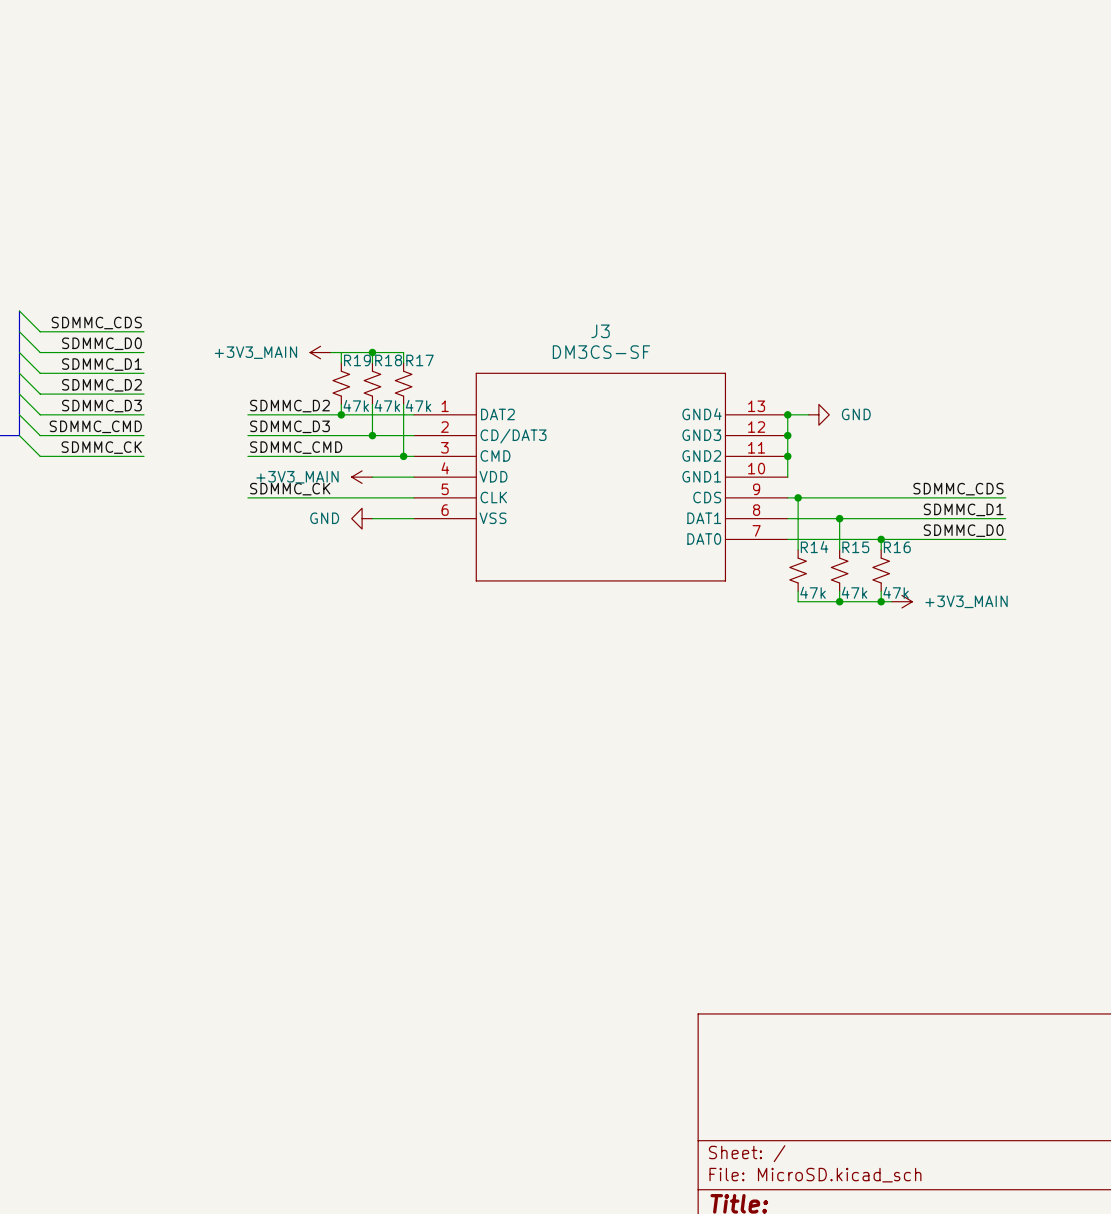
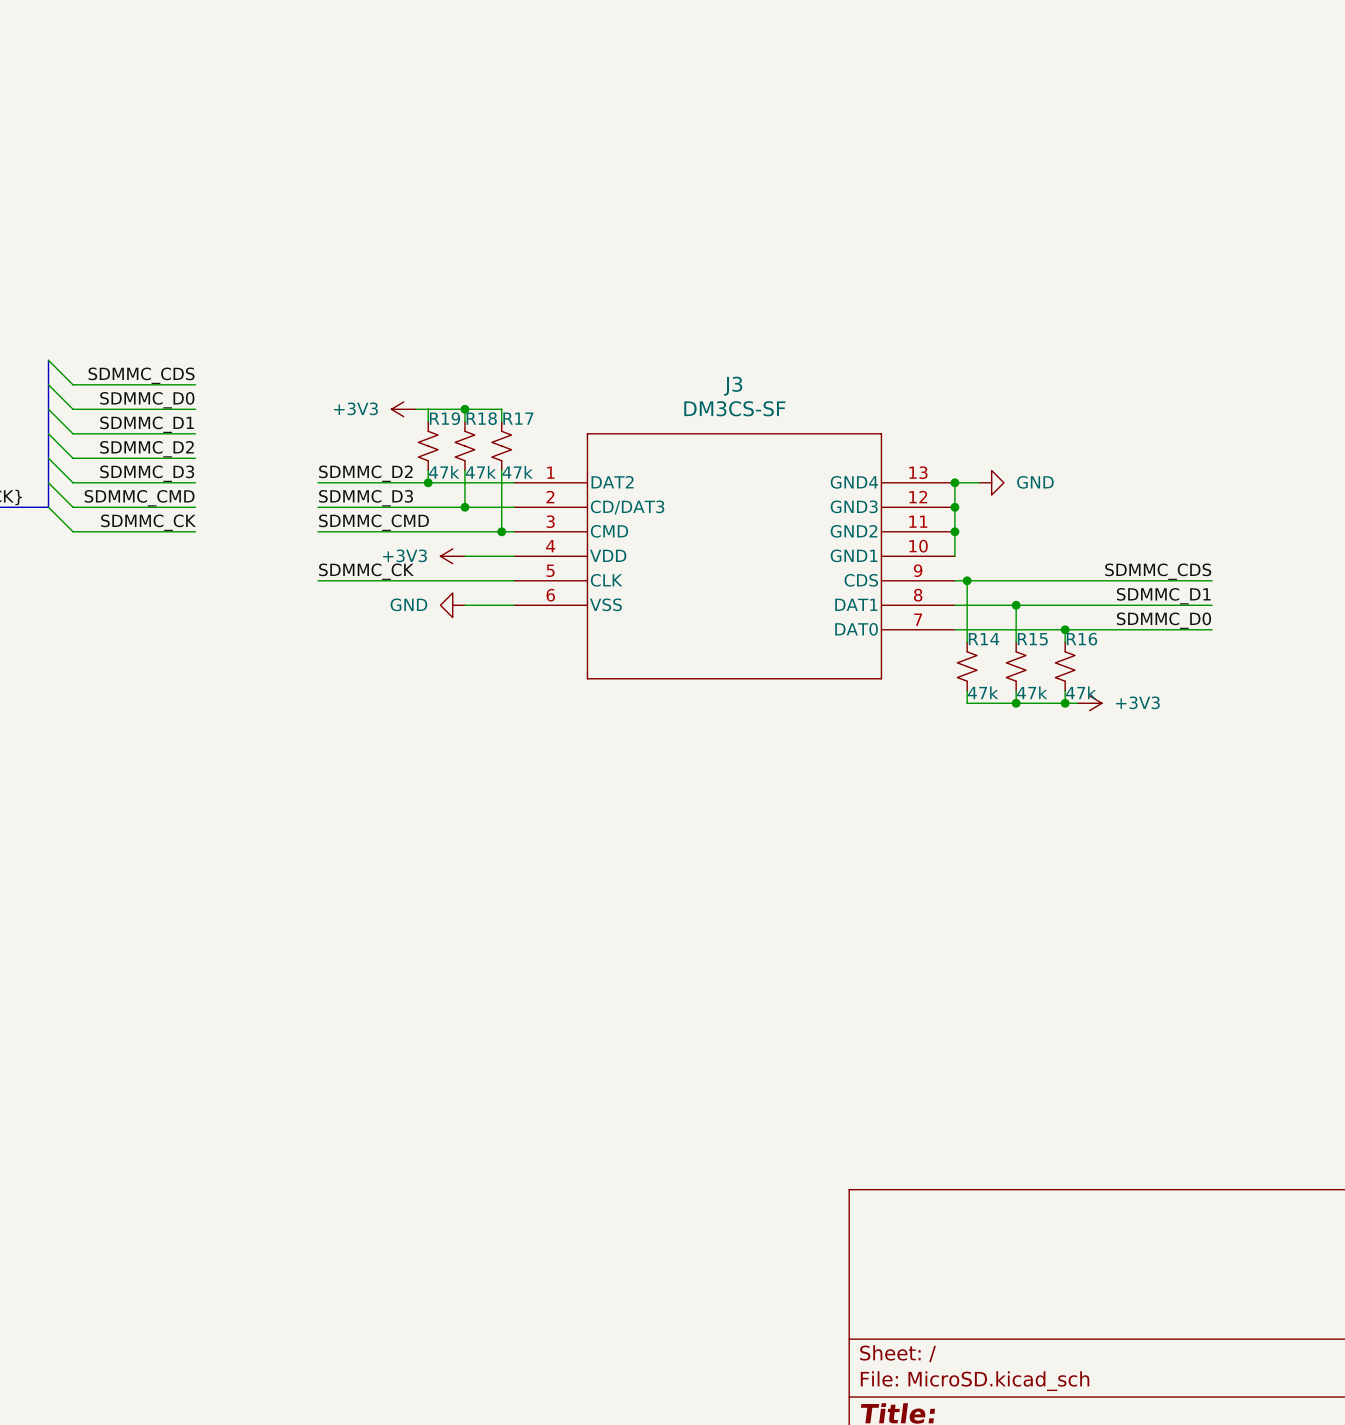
power symbol: +3V3_MAIN (320, 352) -> +3V3 (403, 409)
power symbol: +3V3_MAIN (362, 477) -> +3V3 (452, 556)
power symbol: +3V3_MAIN (901, 601) -> +3V3 (1089, 703)

